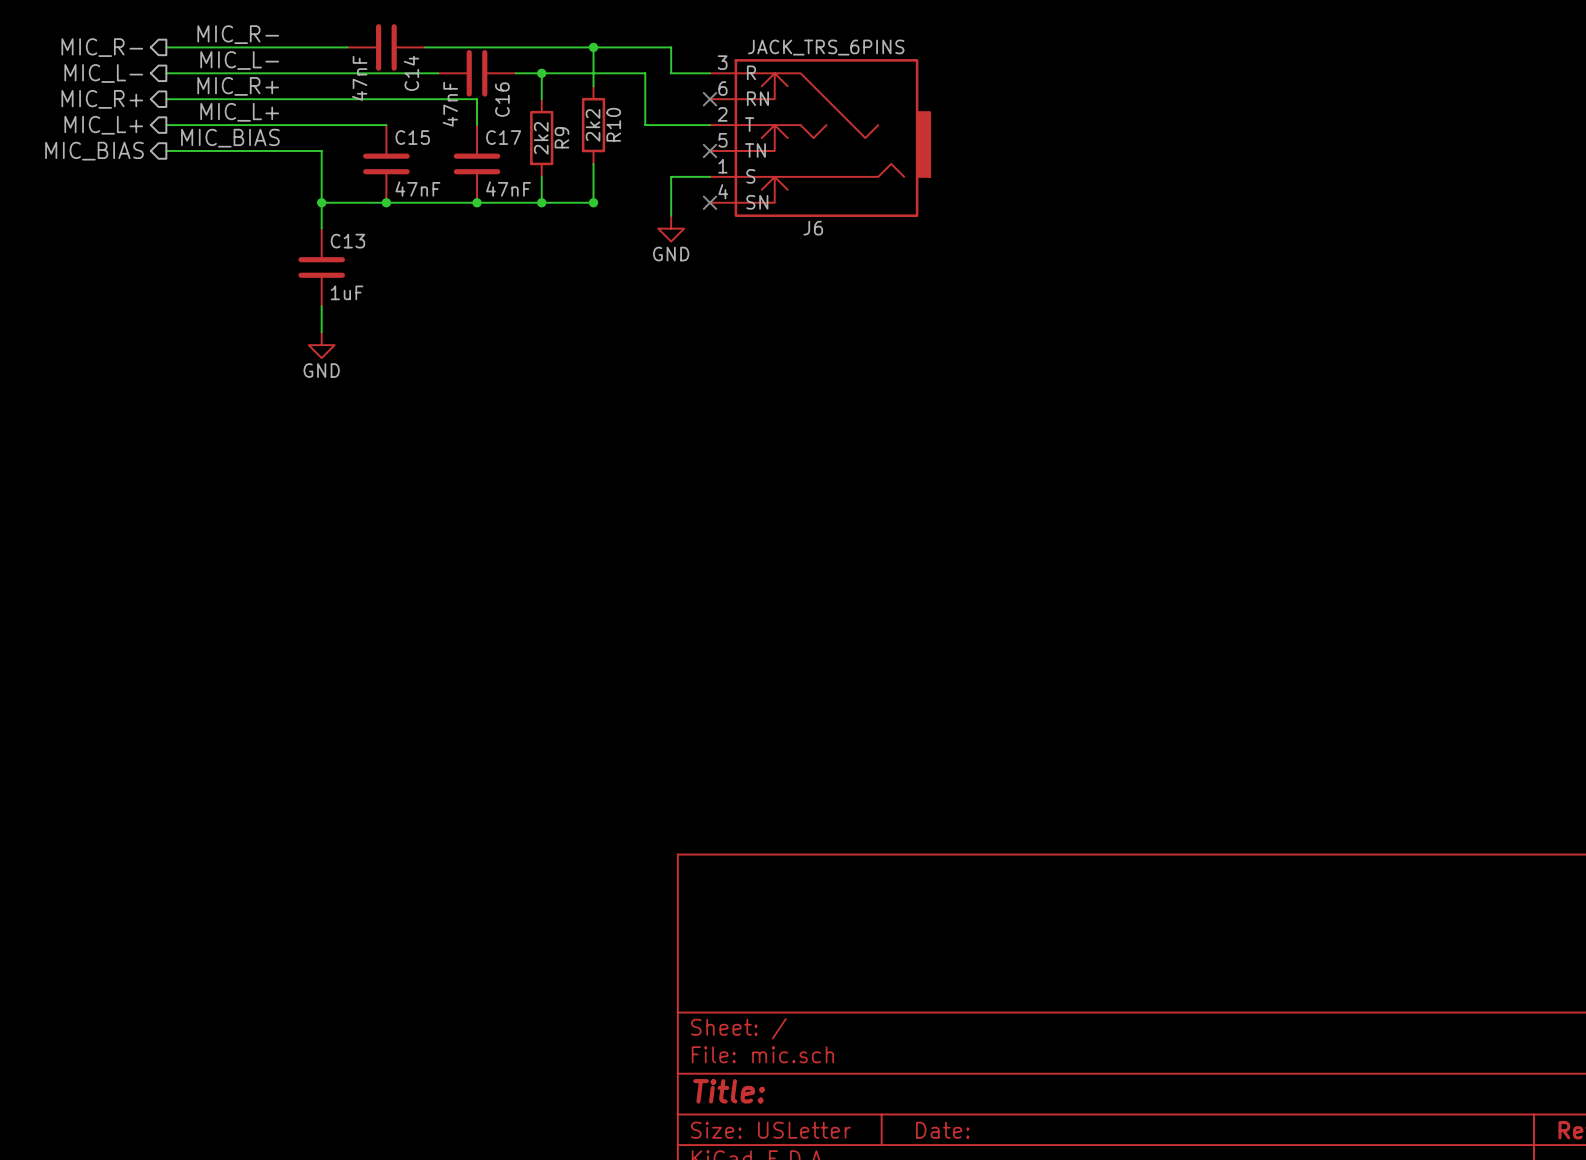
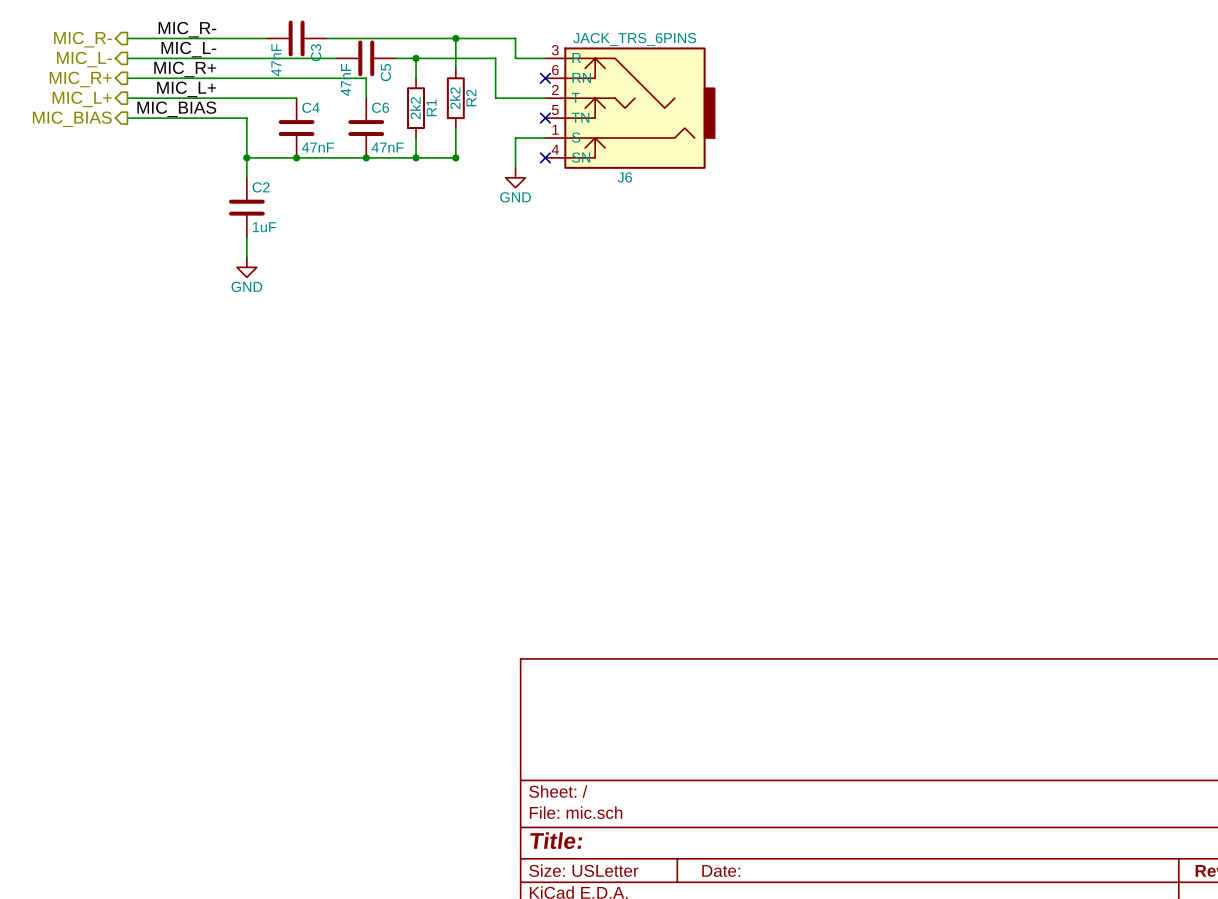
C14 name: C14 (411, 73) -> C3 (316, 52)
C16 name: C16 (502, 99) -> C5 (385, 72)
R10 name: R10 (613, 124) -> R2 (471, 97)
C15 name: C15 (412, 137) -> C4 (310, 107)
C17 name: C17 (503, 137) -> C6 (380, 107)
R9 name: R9 (561, 137) -> R1 (431, 107)
C13 name: C13 (347, 241) -> C2 (261, 187)

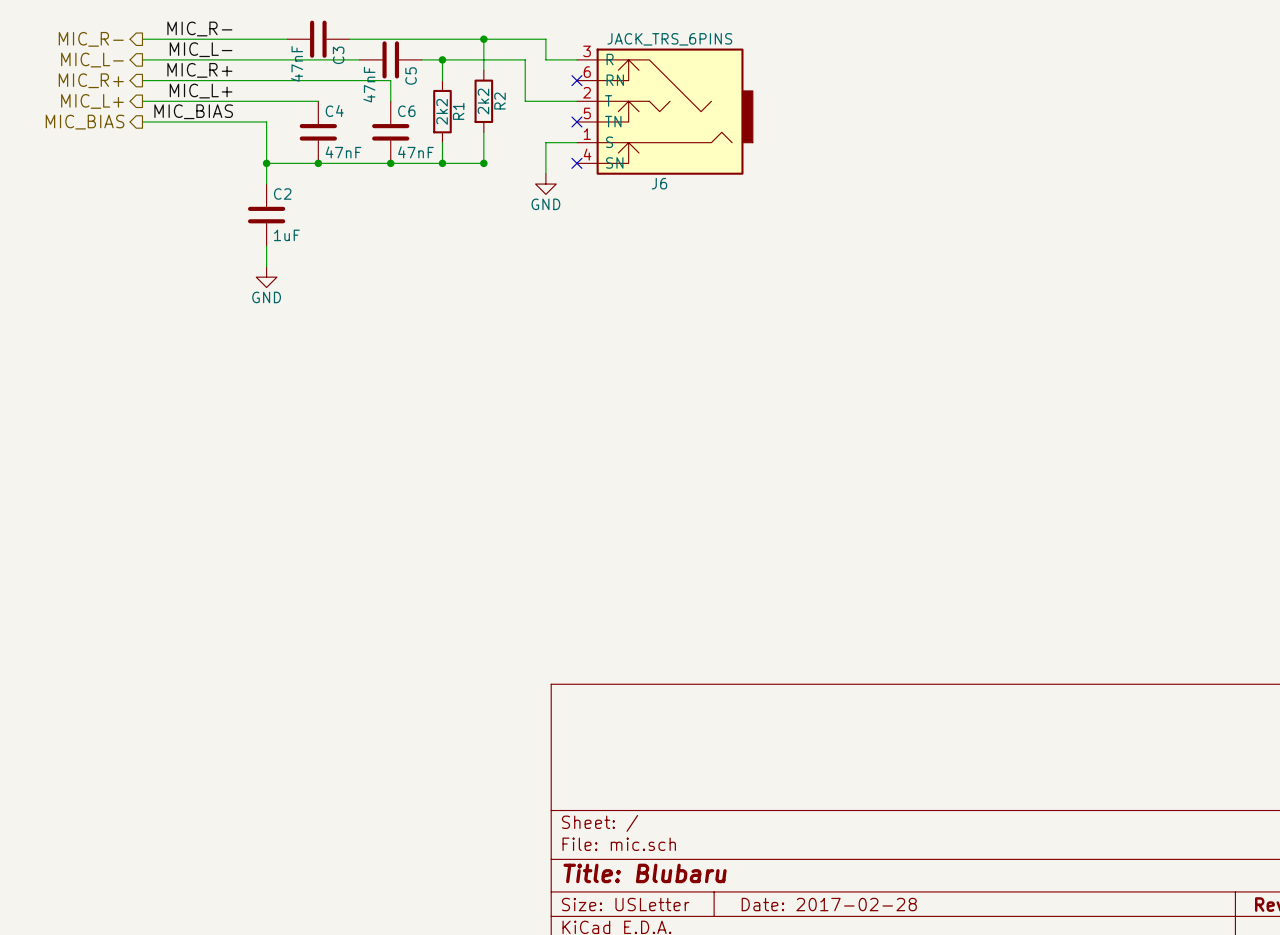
title block: Title: (556, 840) -> Title: Blubaru (645, 873)
title block: Date: (721, 870) -> Date: 2017-02-28 (829, 904)

